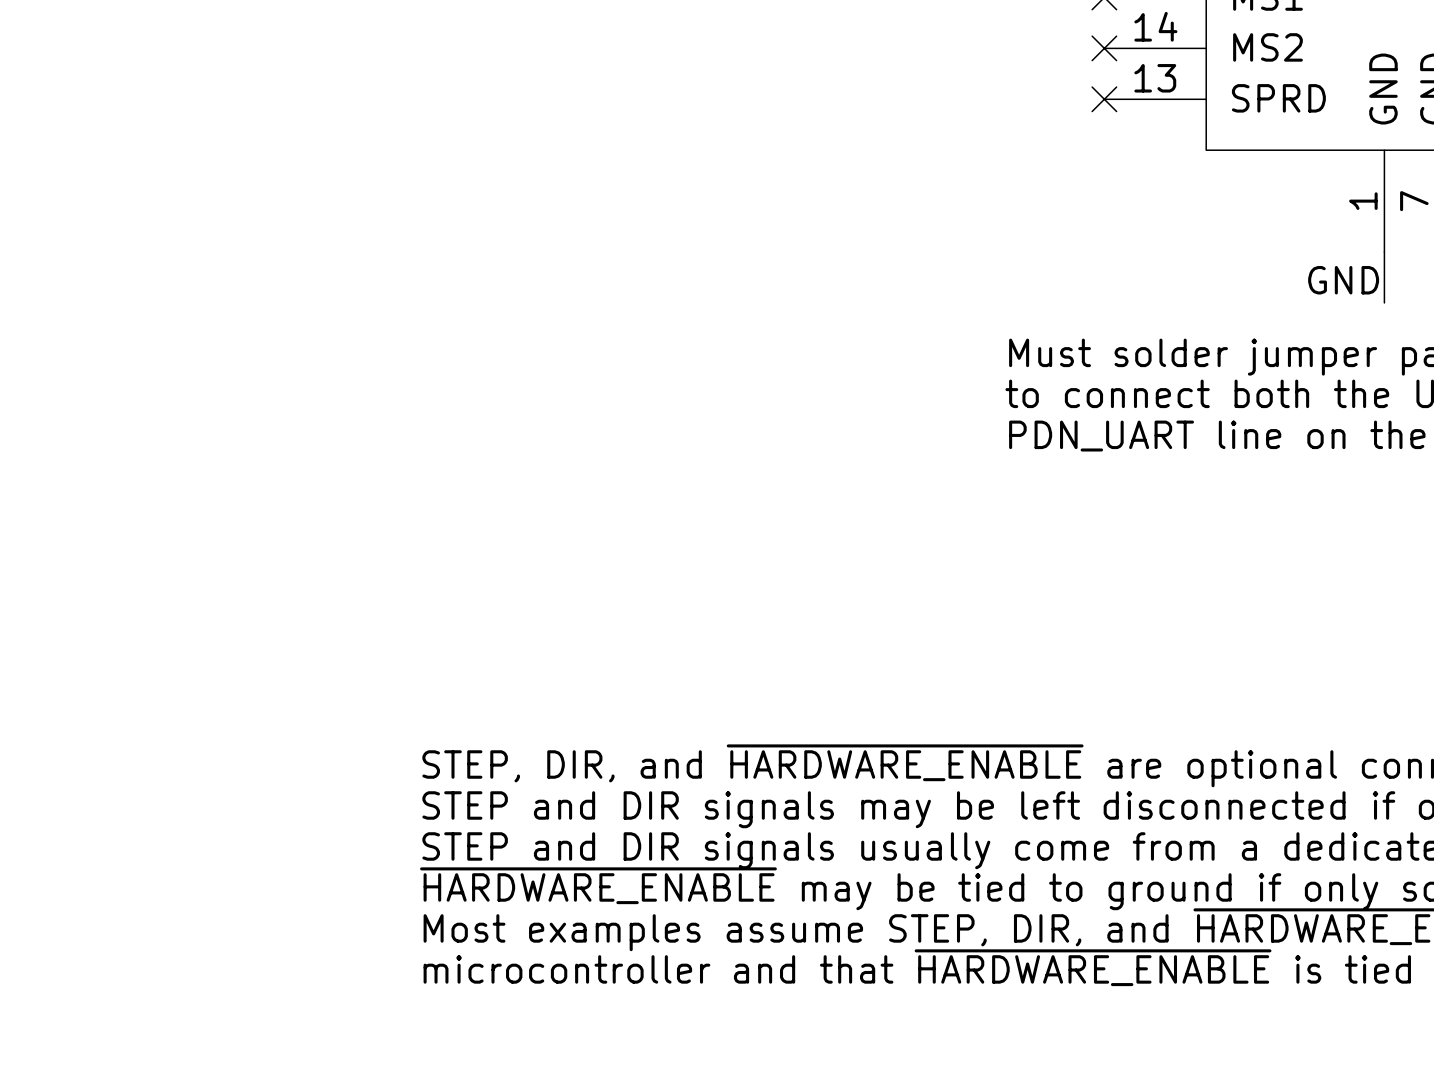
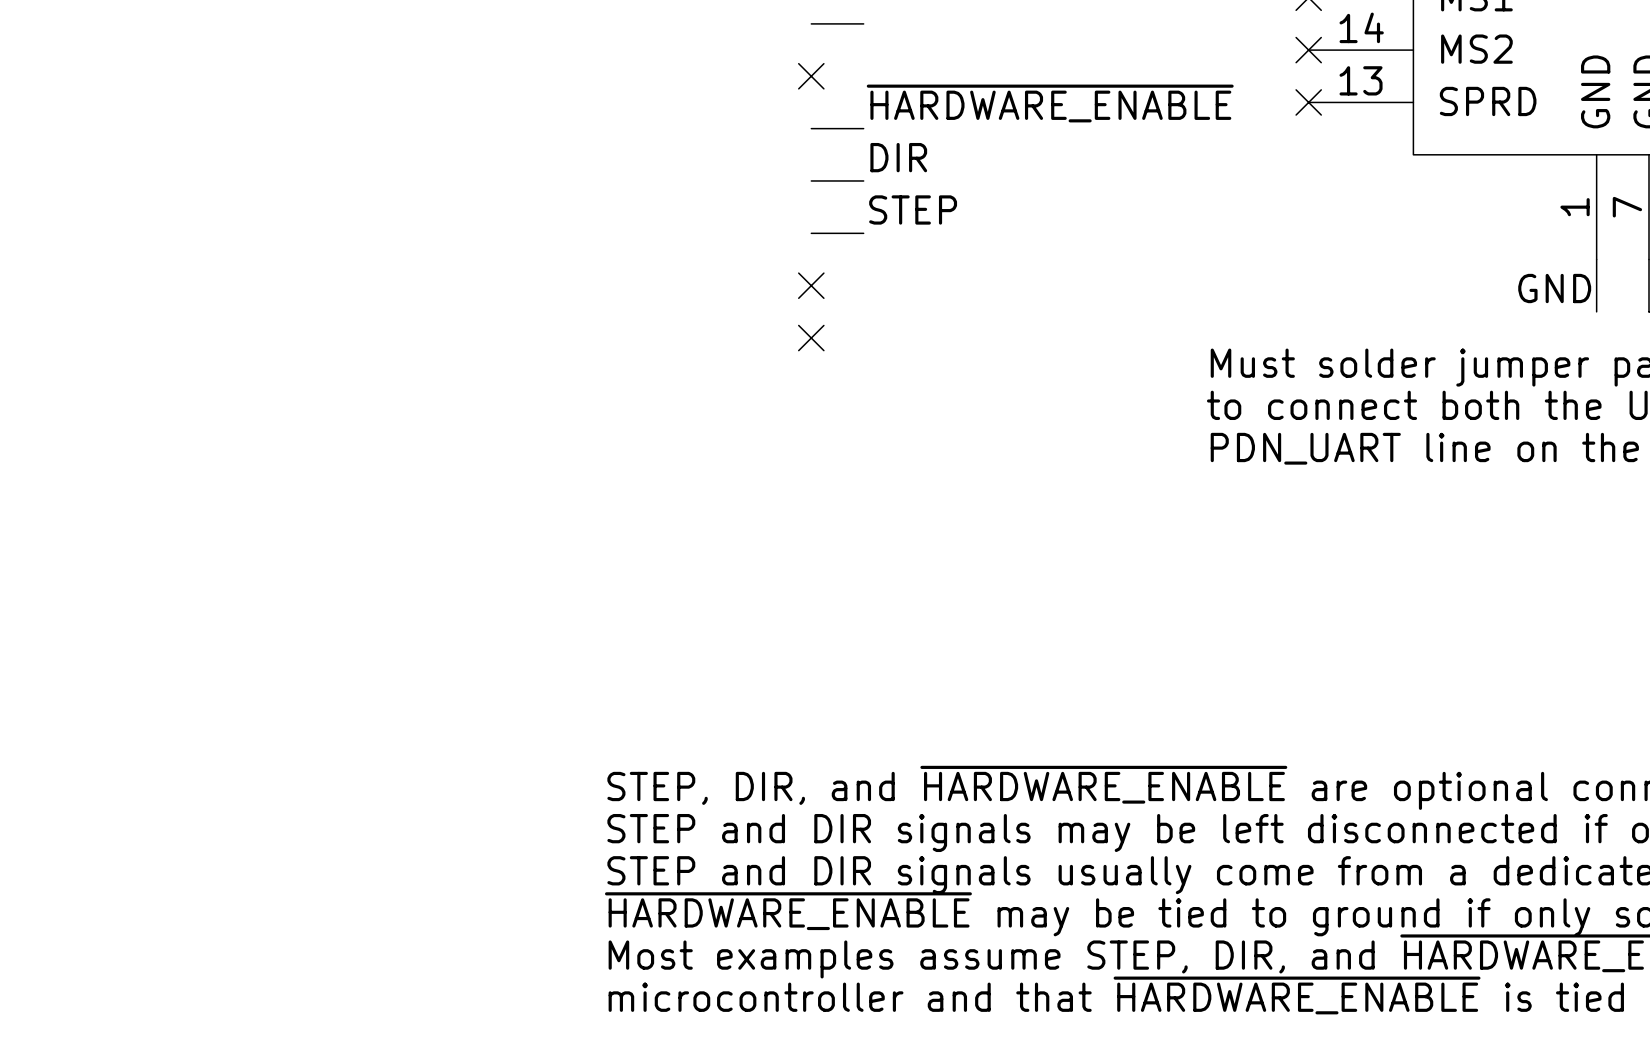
wire: none -> (811, 23) (863, 23)
no-connect mark: none -> (811, 76)
label: none -> ~{HARDWARE_ENABLE} (1050, 103)
wire: none -> (811, 128) (863, 128)
label: none -> DIR (898, 157)
wire: none -> (811, 180) (863, 180)
label: none -> STEP (913, 209)
wire: none -> (811, 233) (863, 233)
no-connect mark: none -> (811, 285)
no-connect mark: none -> (811, 338)

